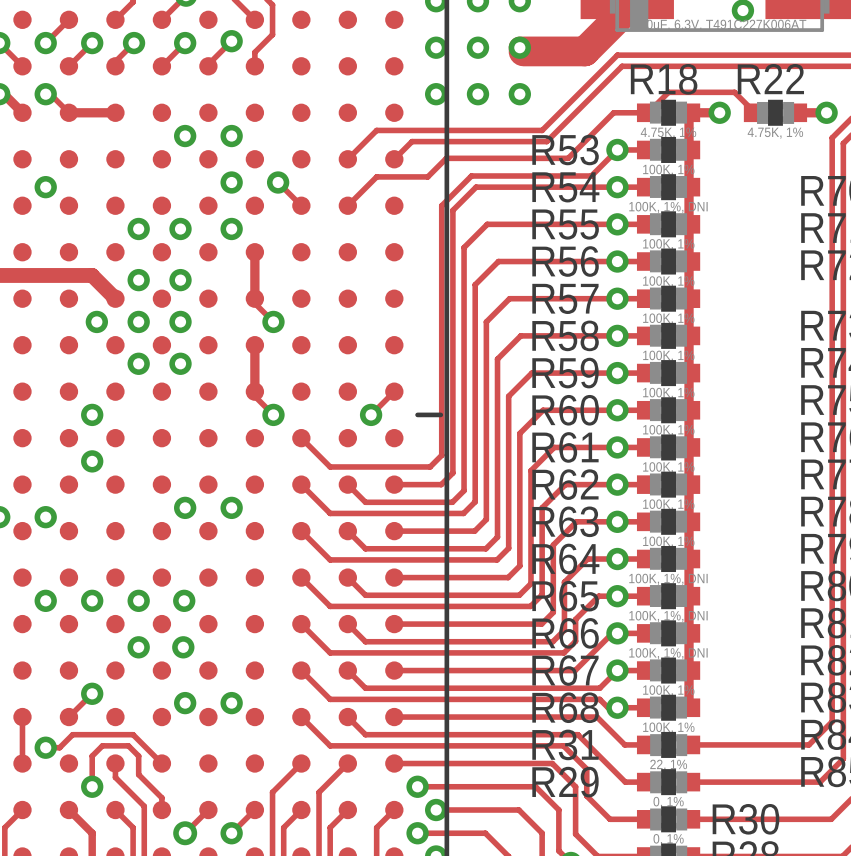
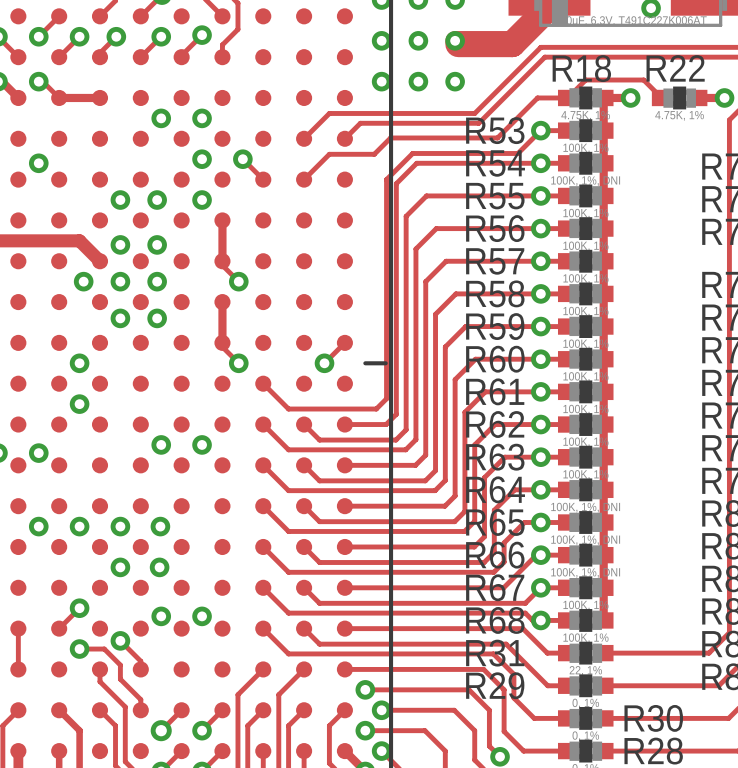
via: none -> (120, 640)
via: none -> (79, 649)
track: (45, 747) (59, 747) (72, 734) (133, 734) (161, 763) -> (120, 640) (140, 661) (140, 669)
via: (45, 747) -> none
track: (138, 758) (138, 756) (128, 745) (102, 745) (92, 756) (92, 786) -> (120, 665) (104, 649) (79, 649)
via: (92, 786) -> none

